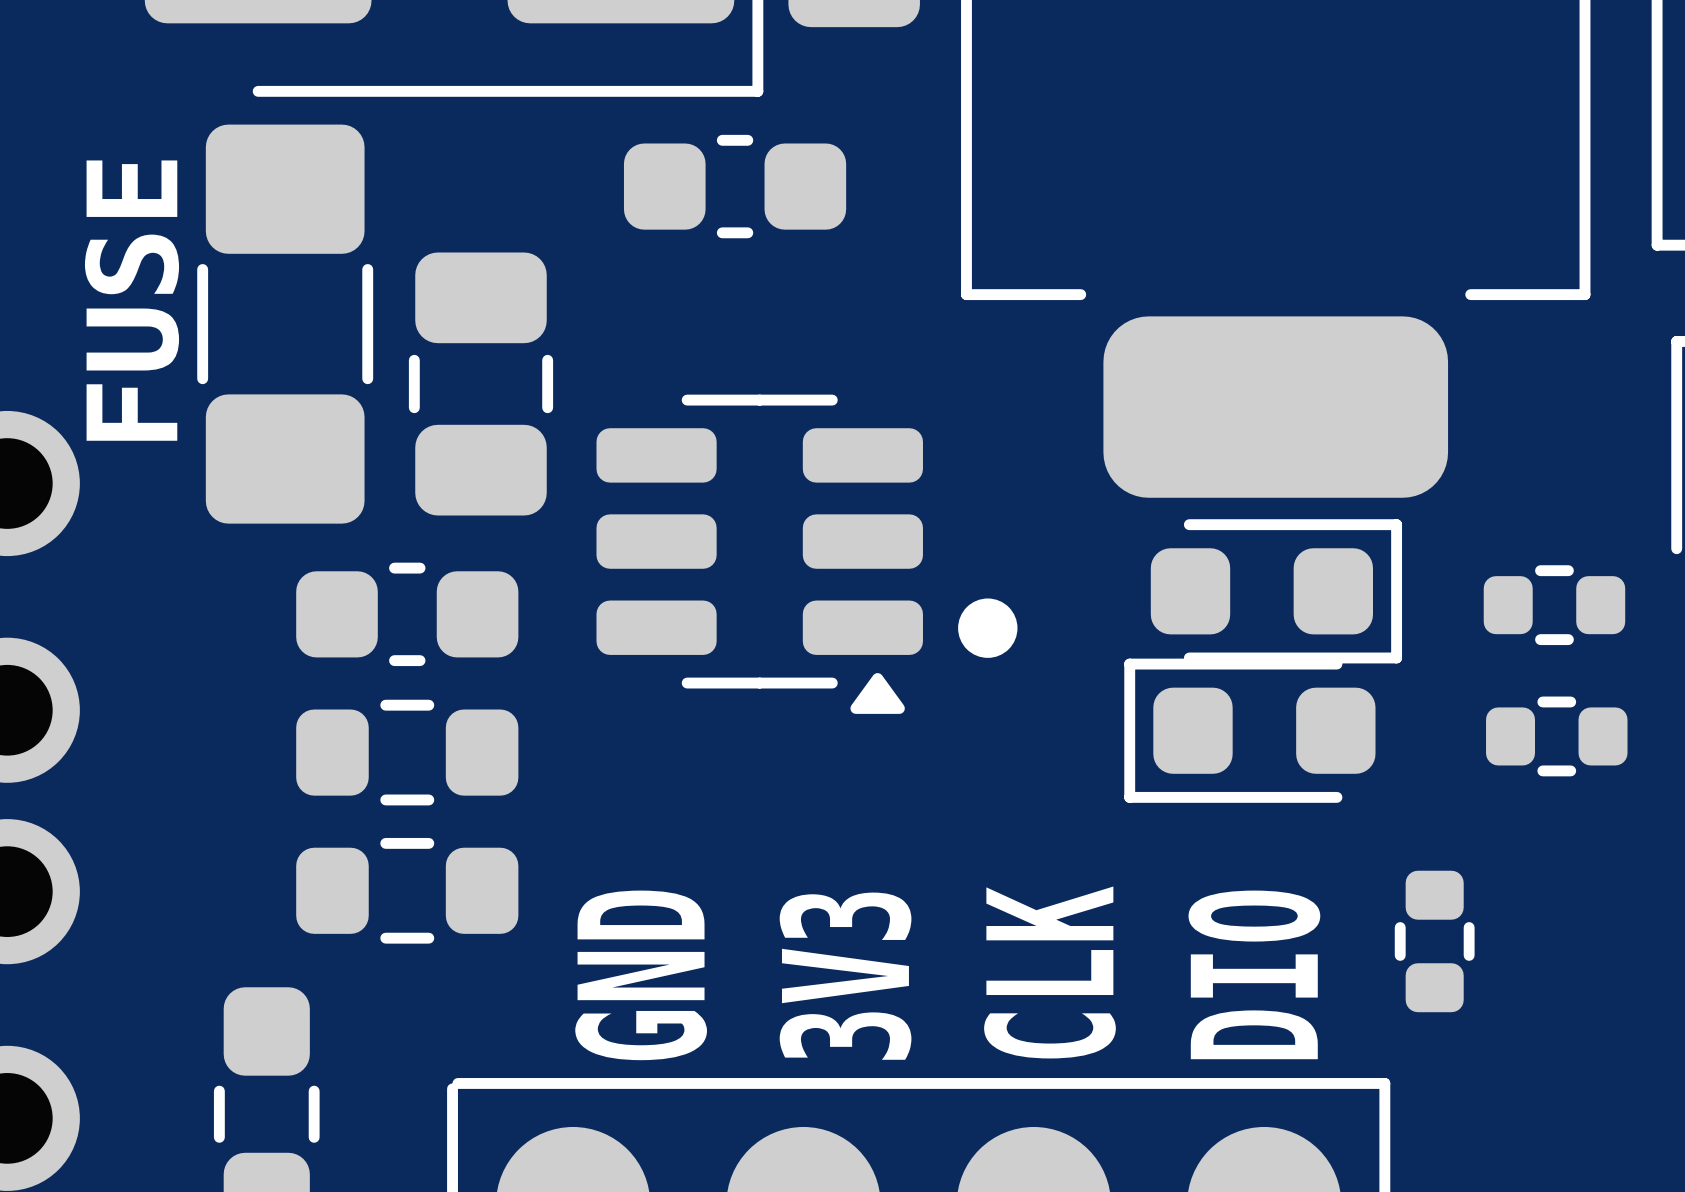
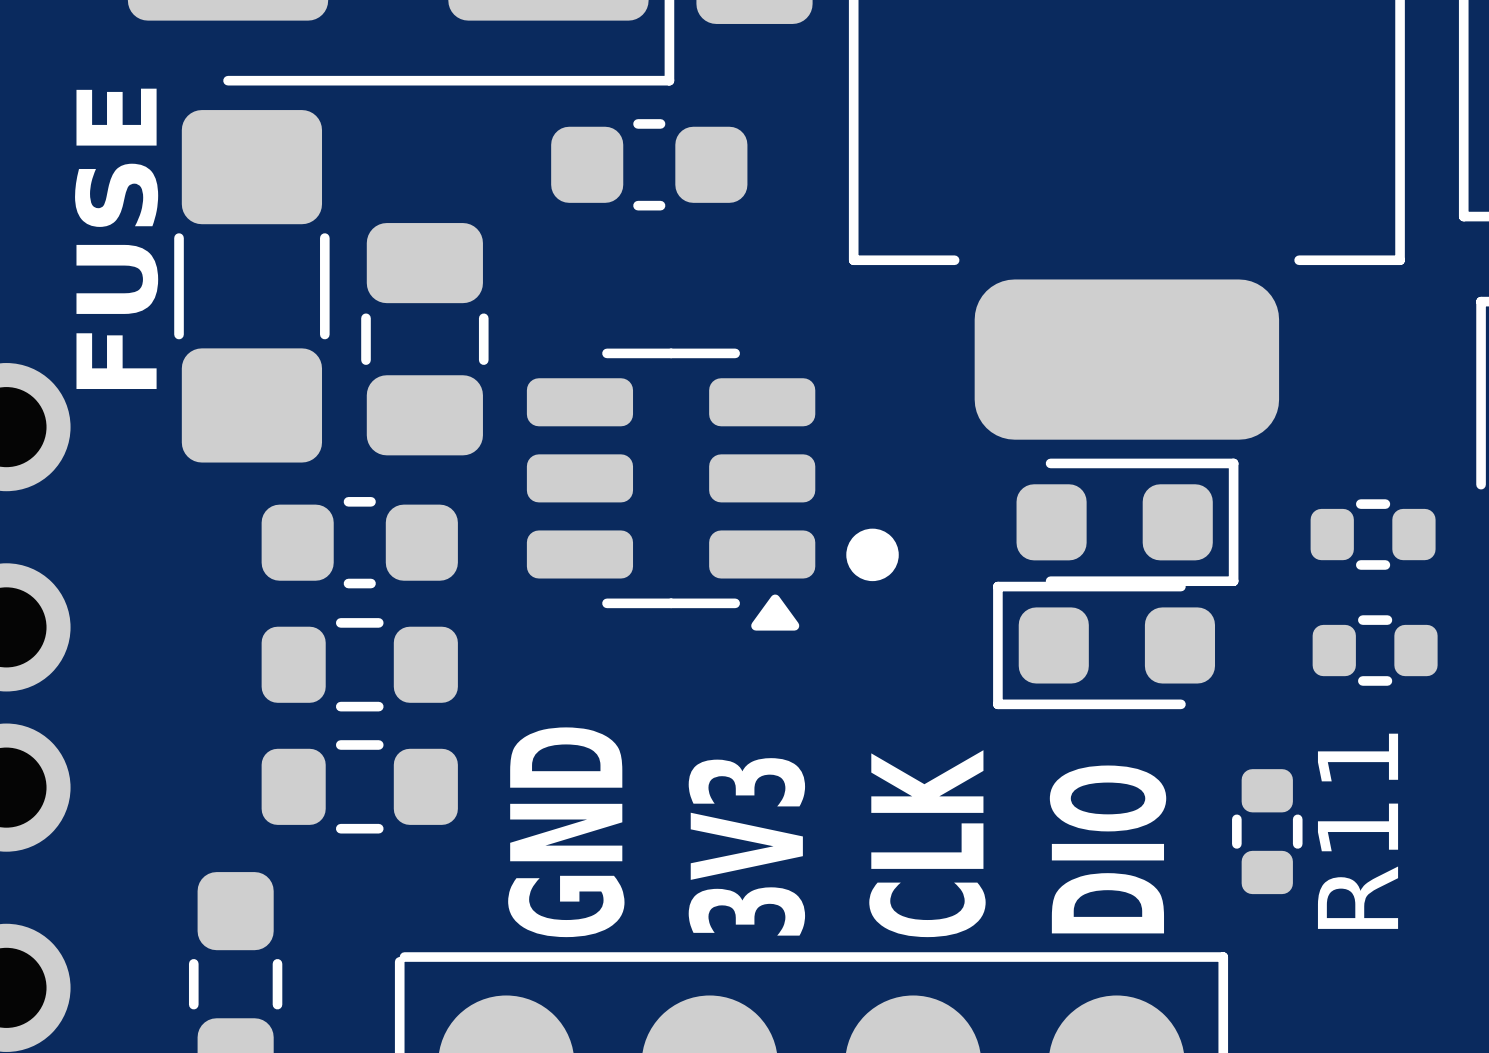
R11 name: none -> R11 (1358, 831)

